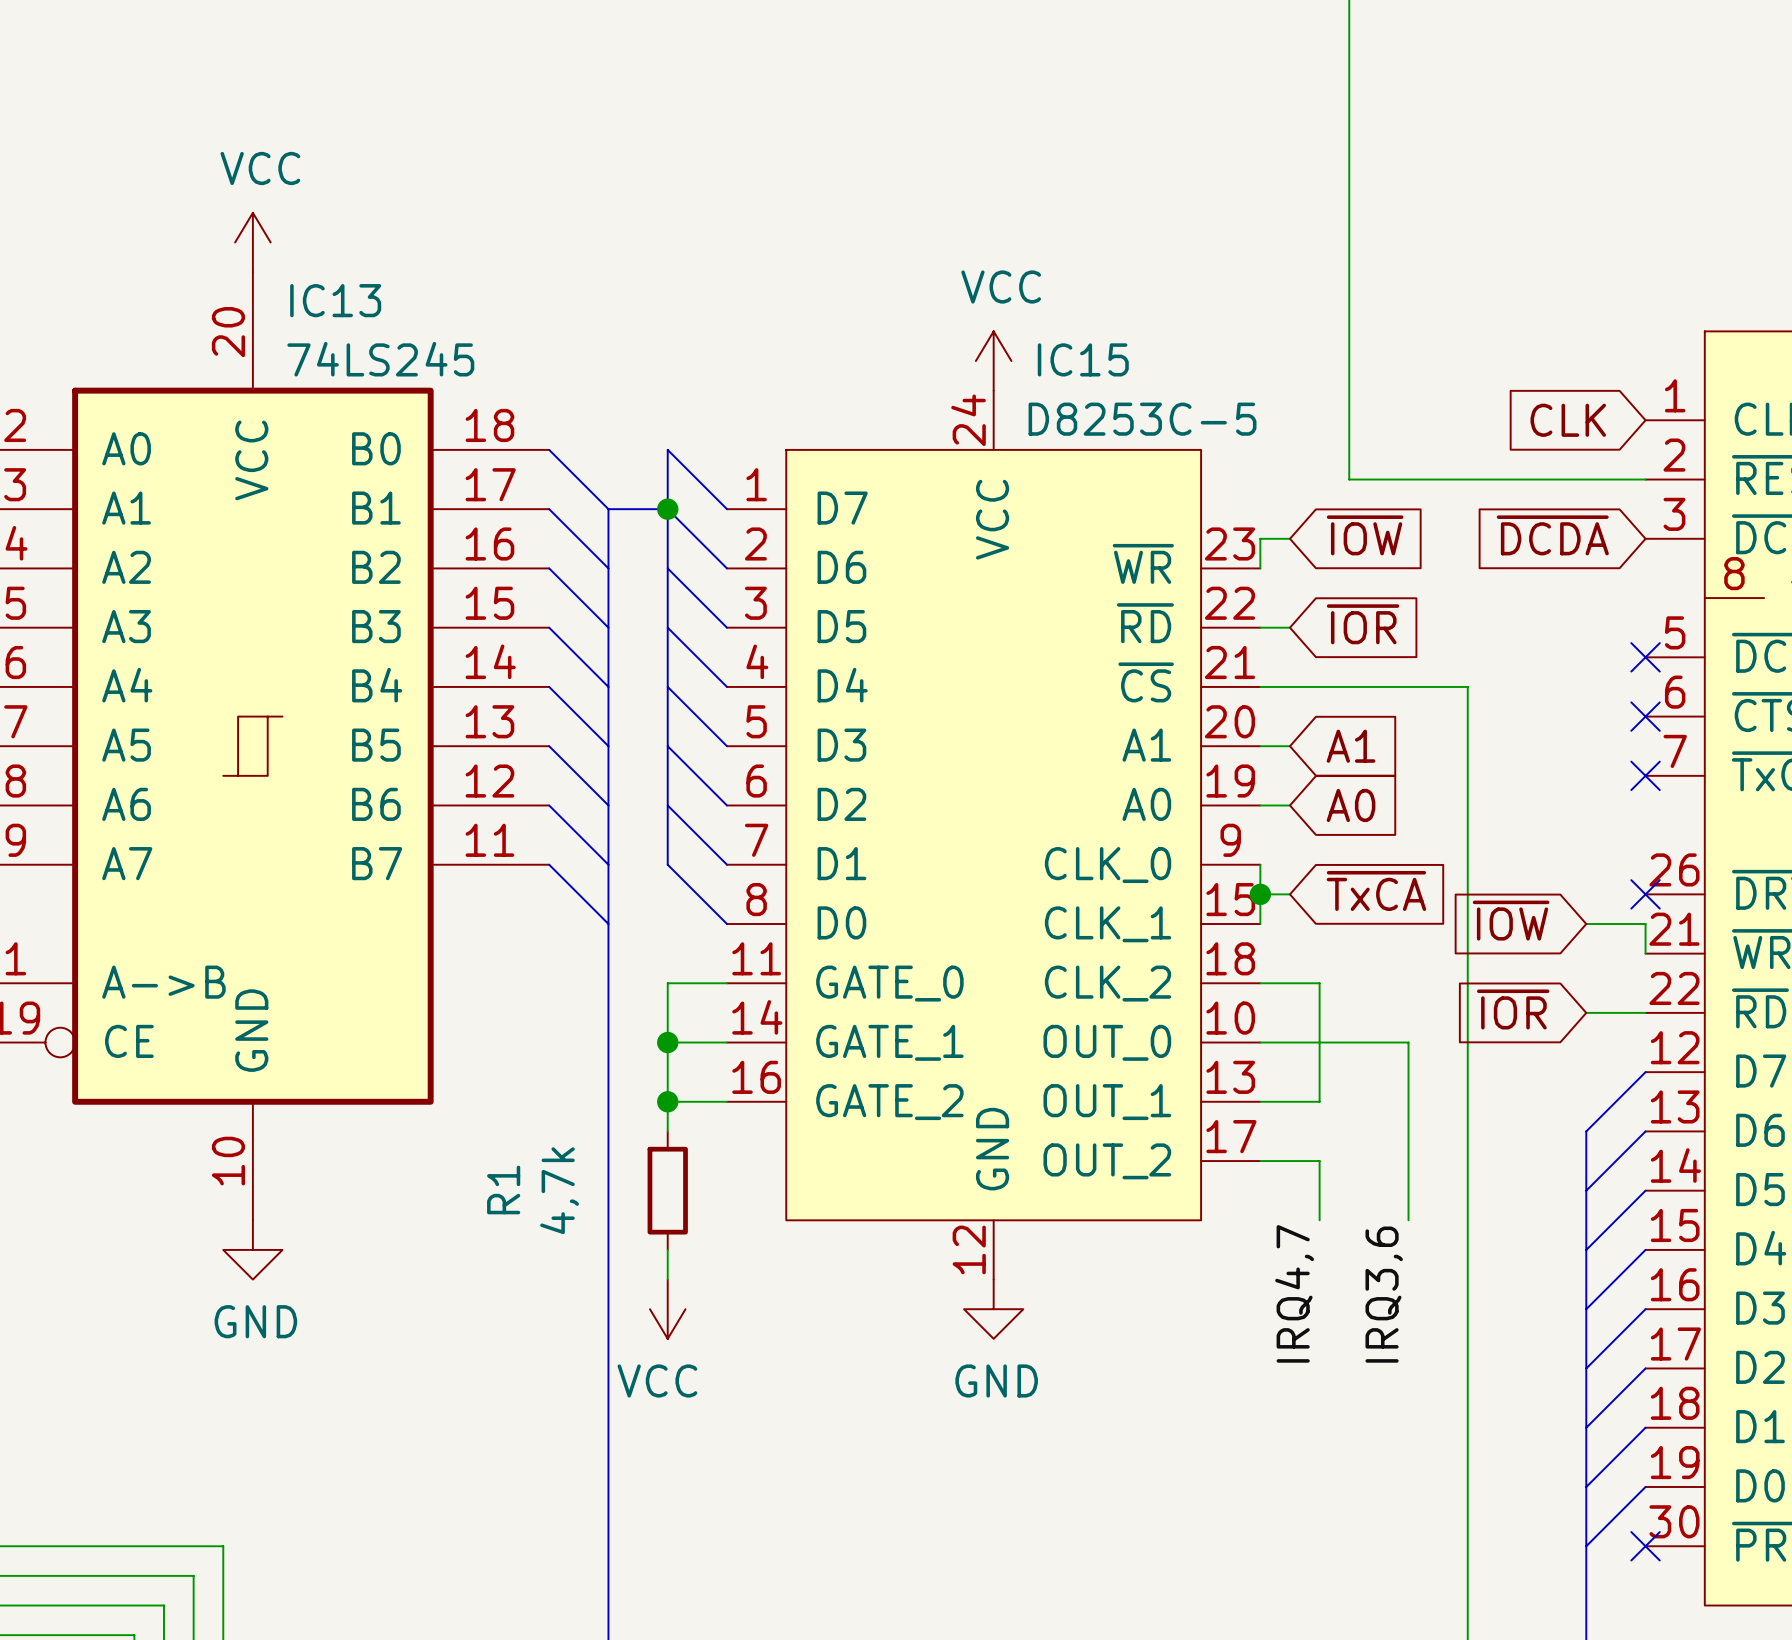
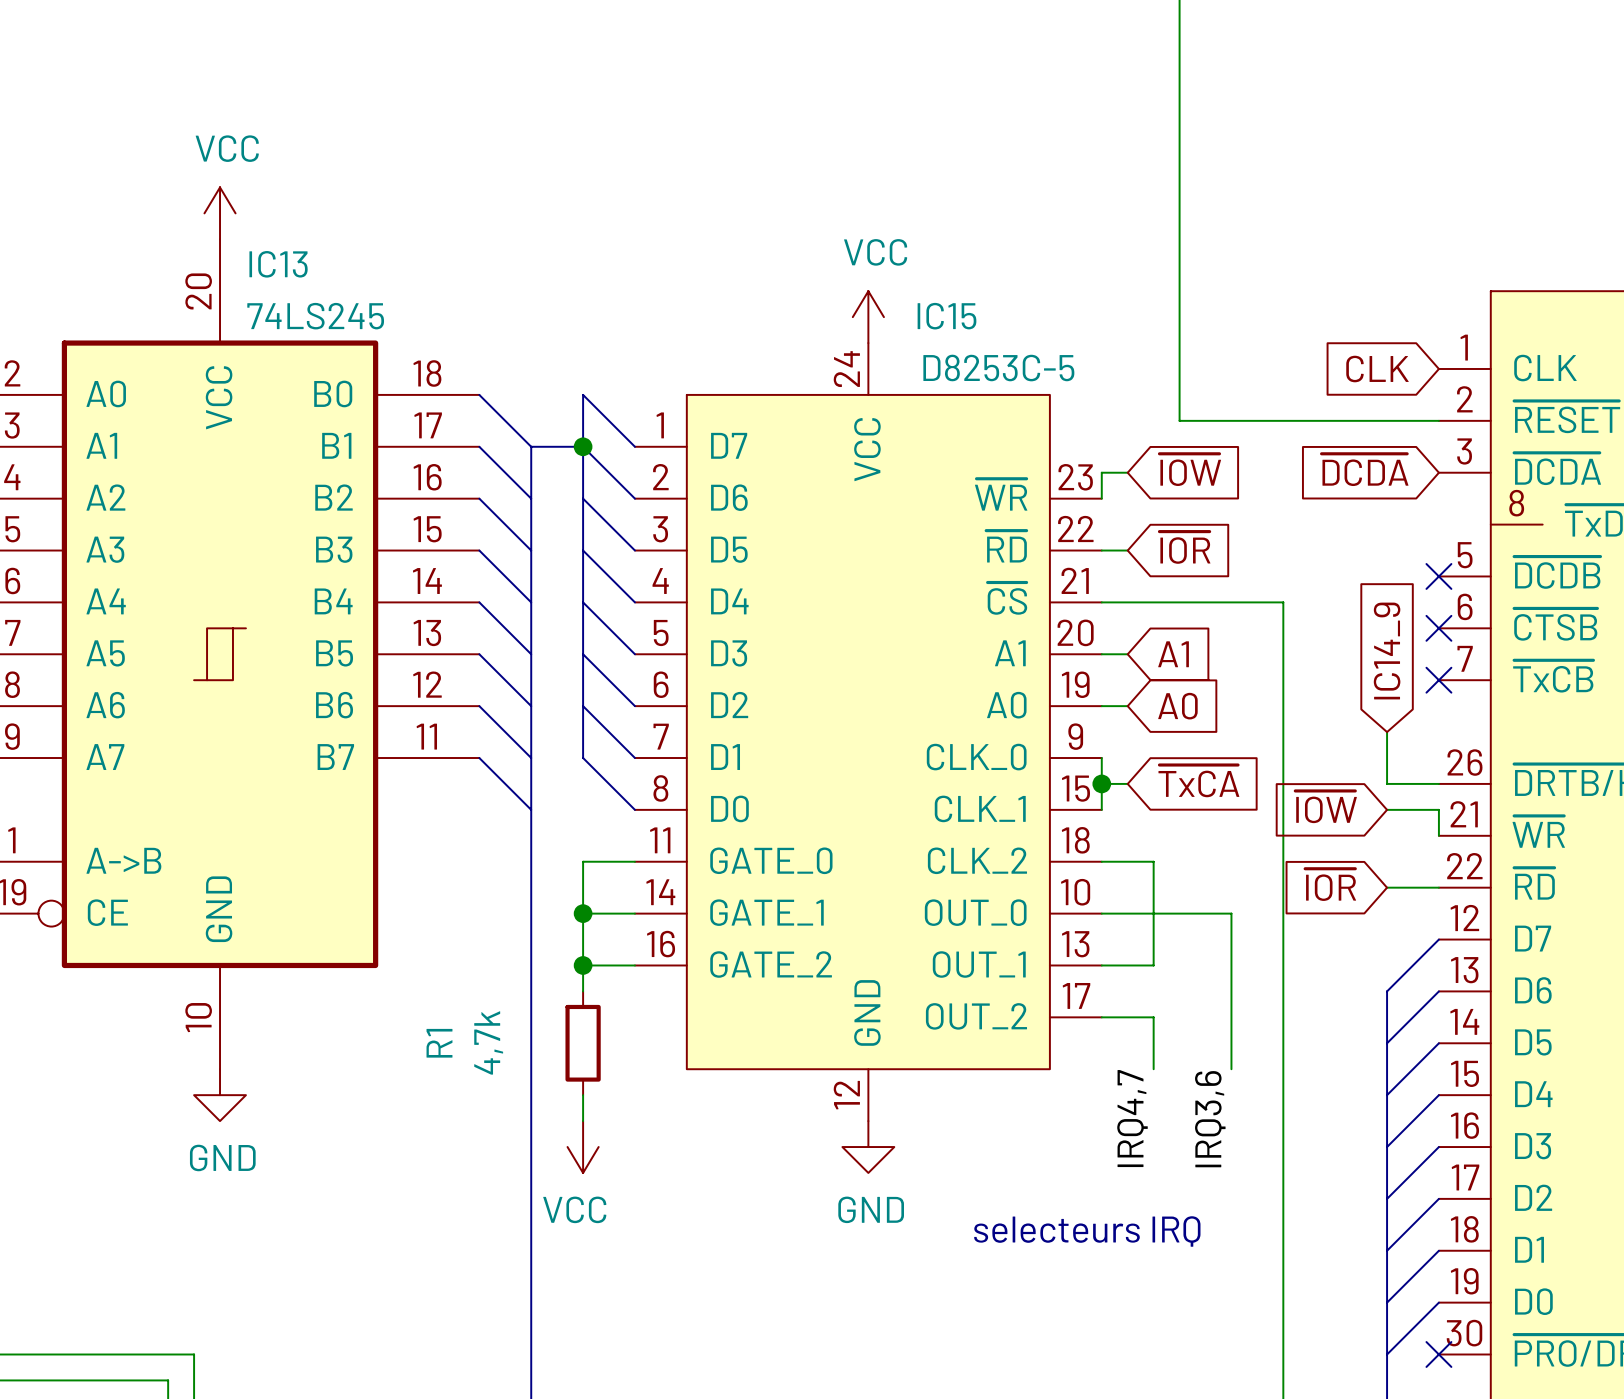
global label: none -> IC14_9 (1387, 651)
wire: none -> (1387, 732) (1387, 783) (1438, 783)
no-connect mark: (1645, 894) -> none
text: none -> selecteurs IRQ (1087, 1231)

